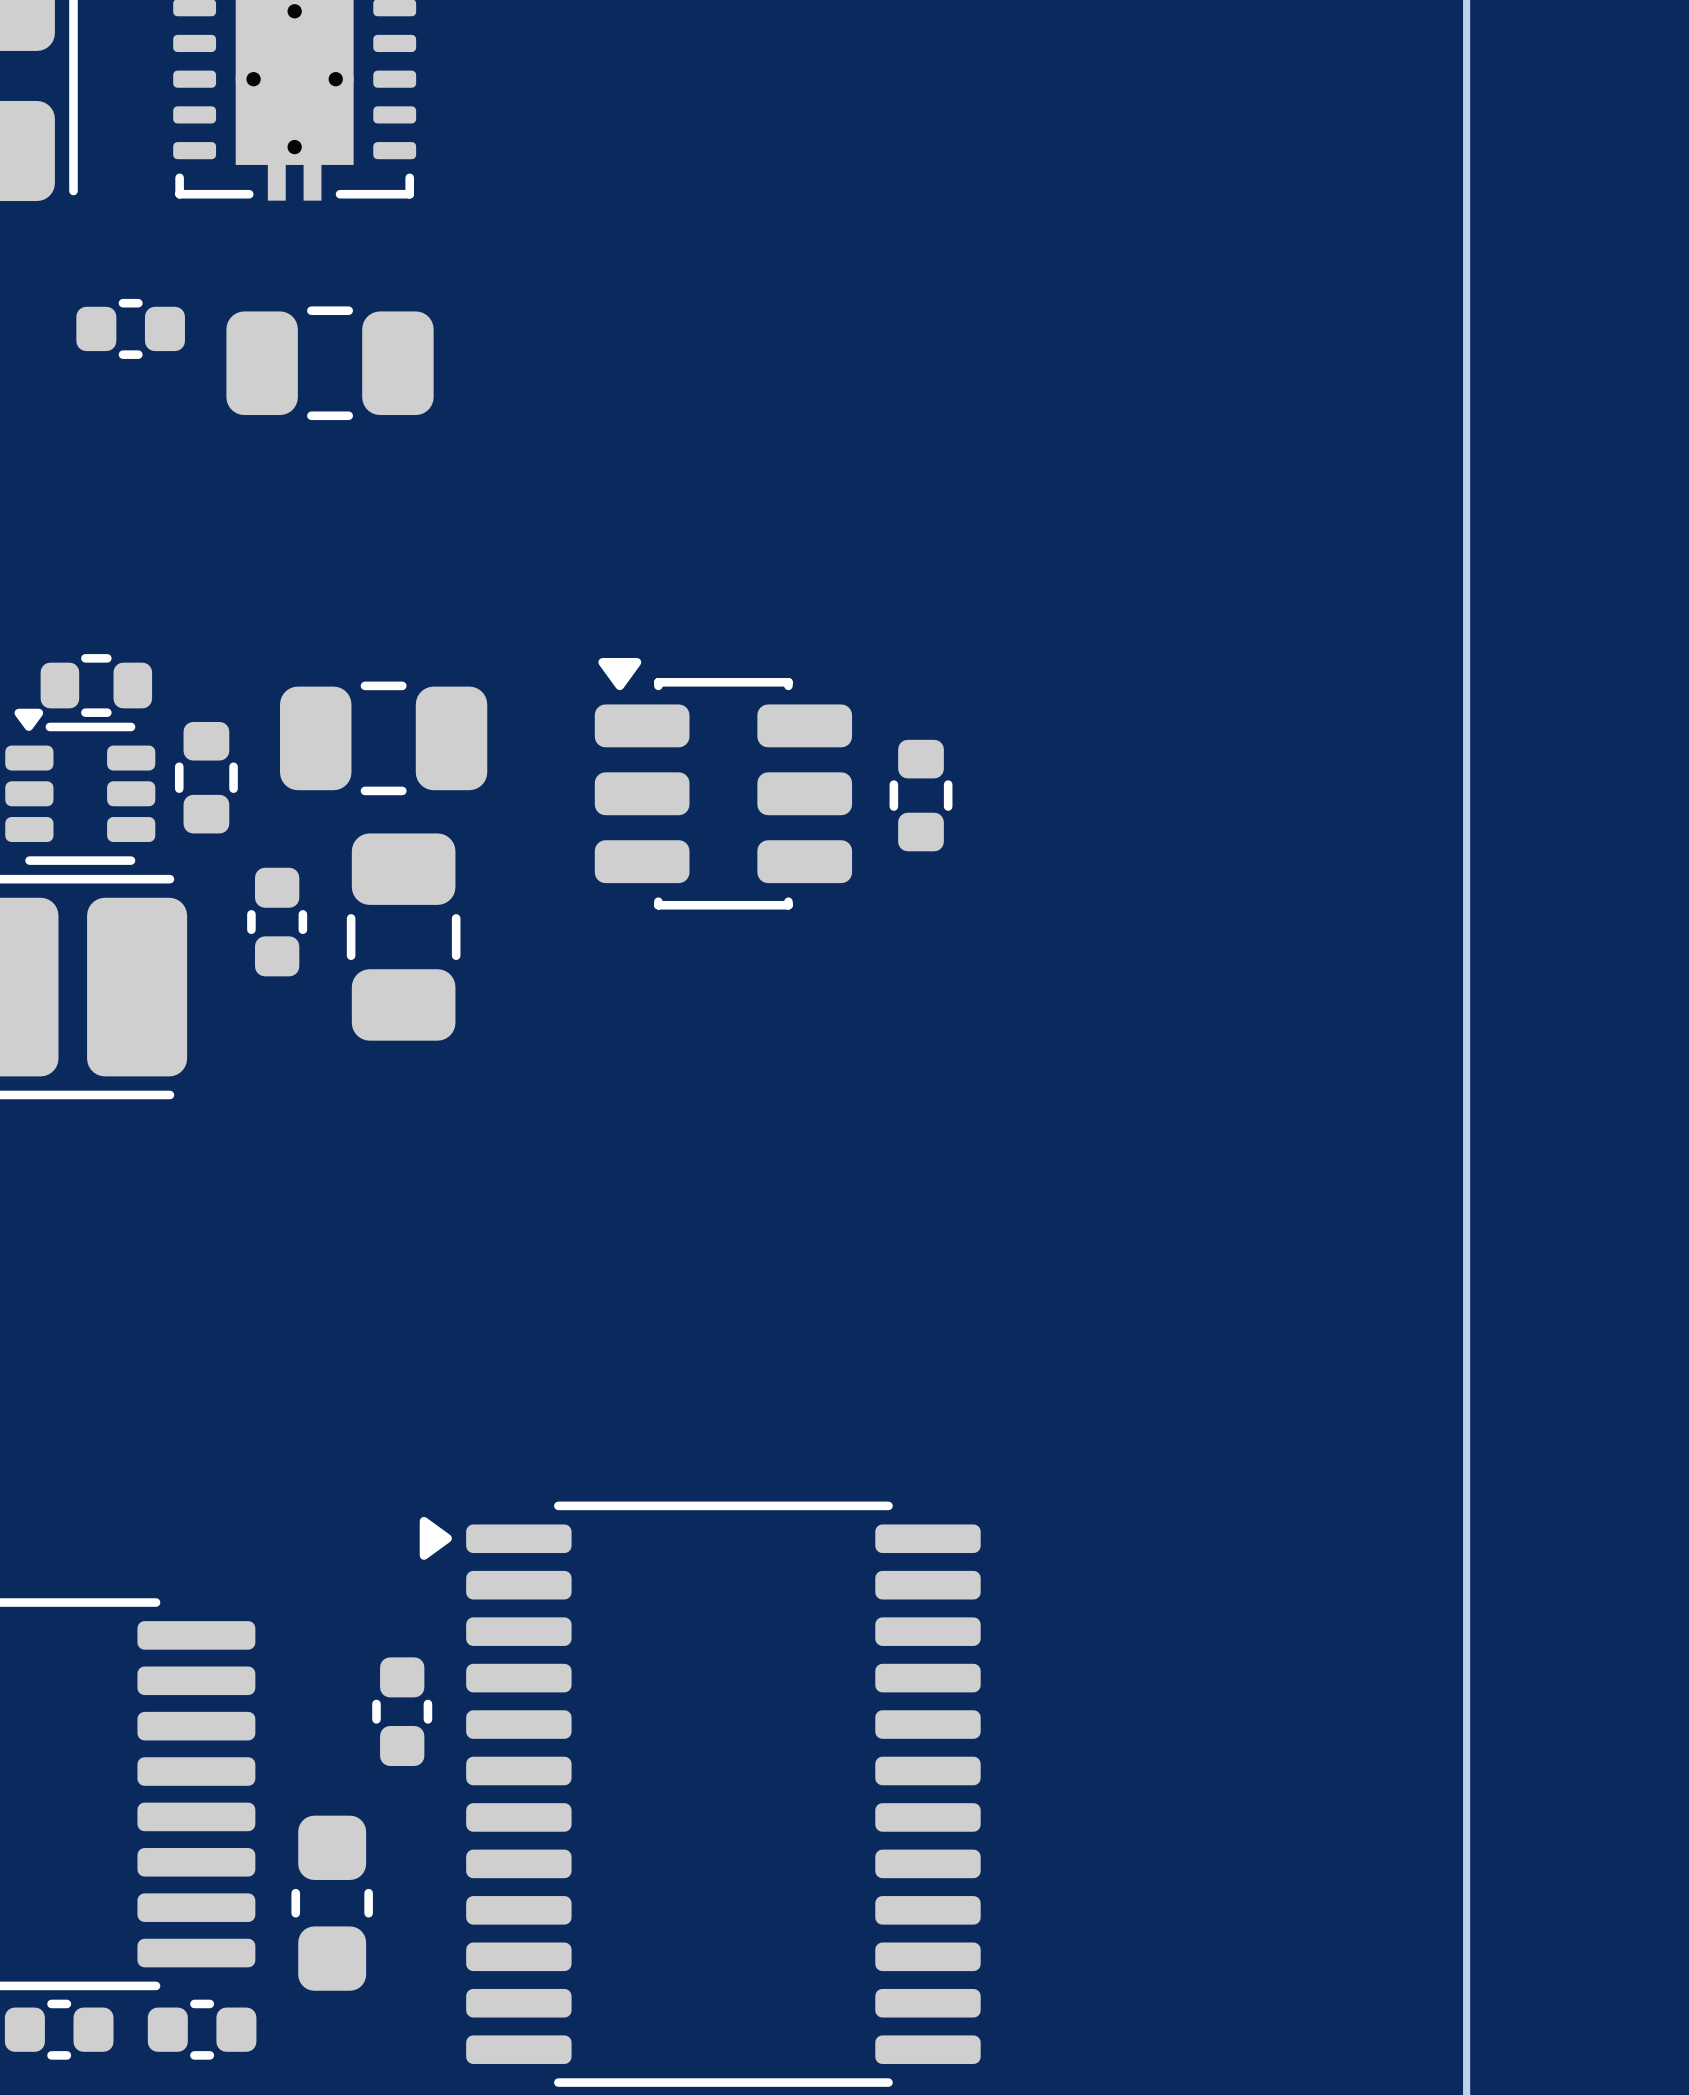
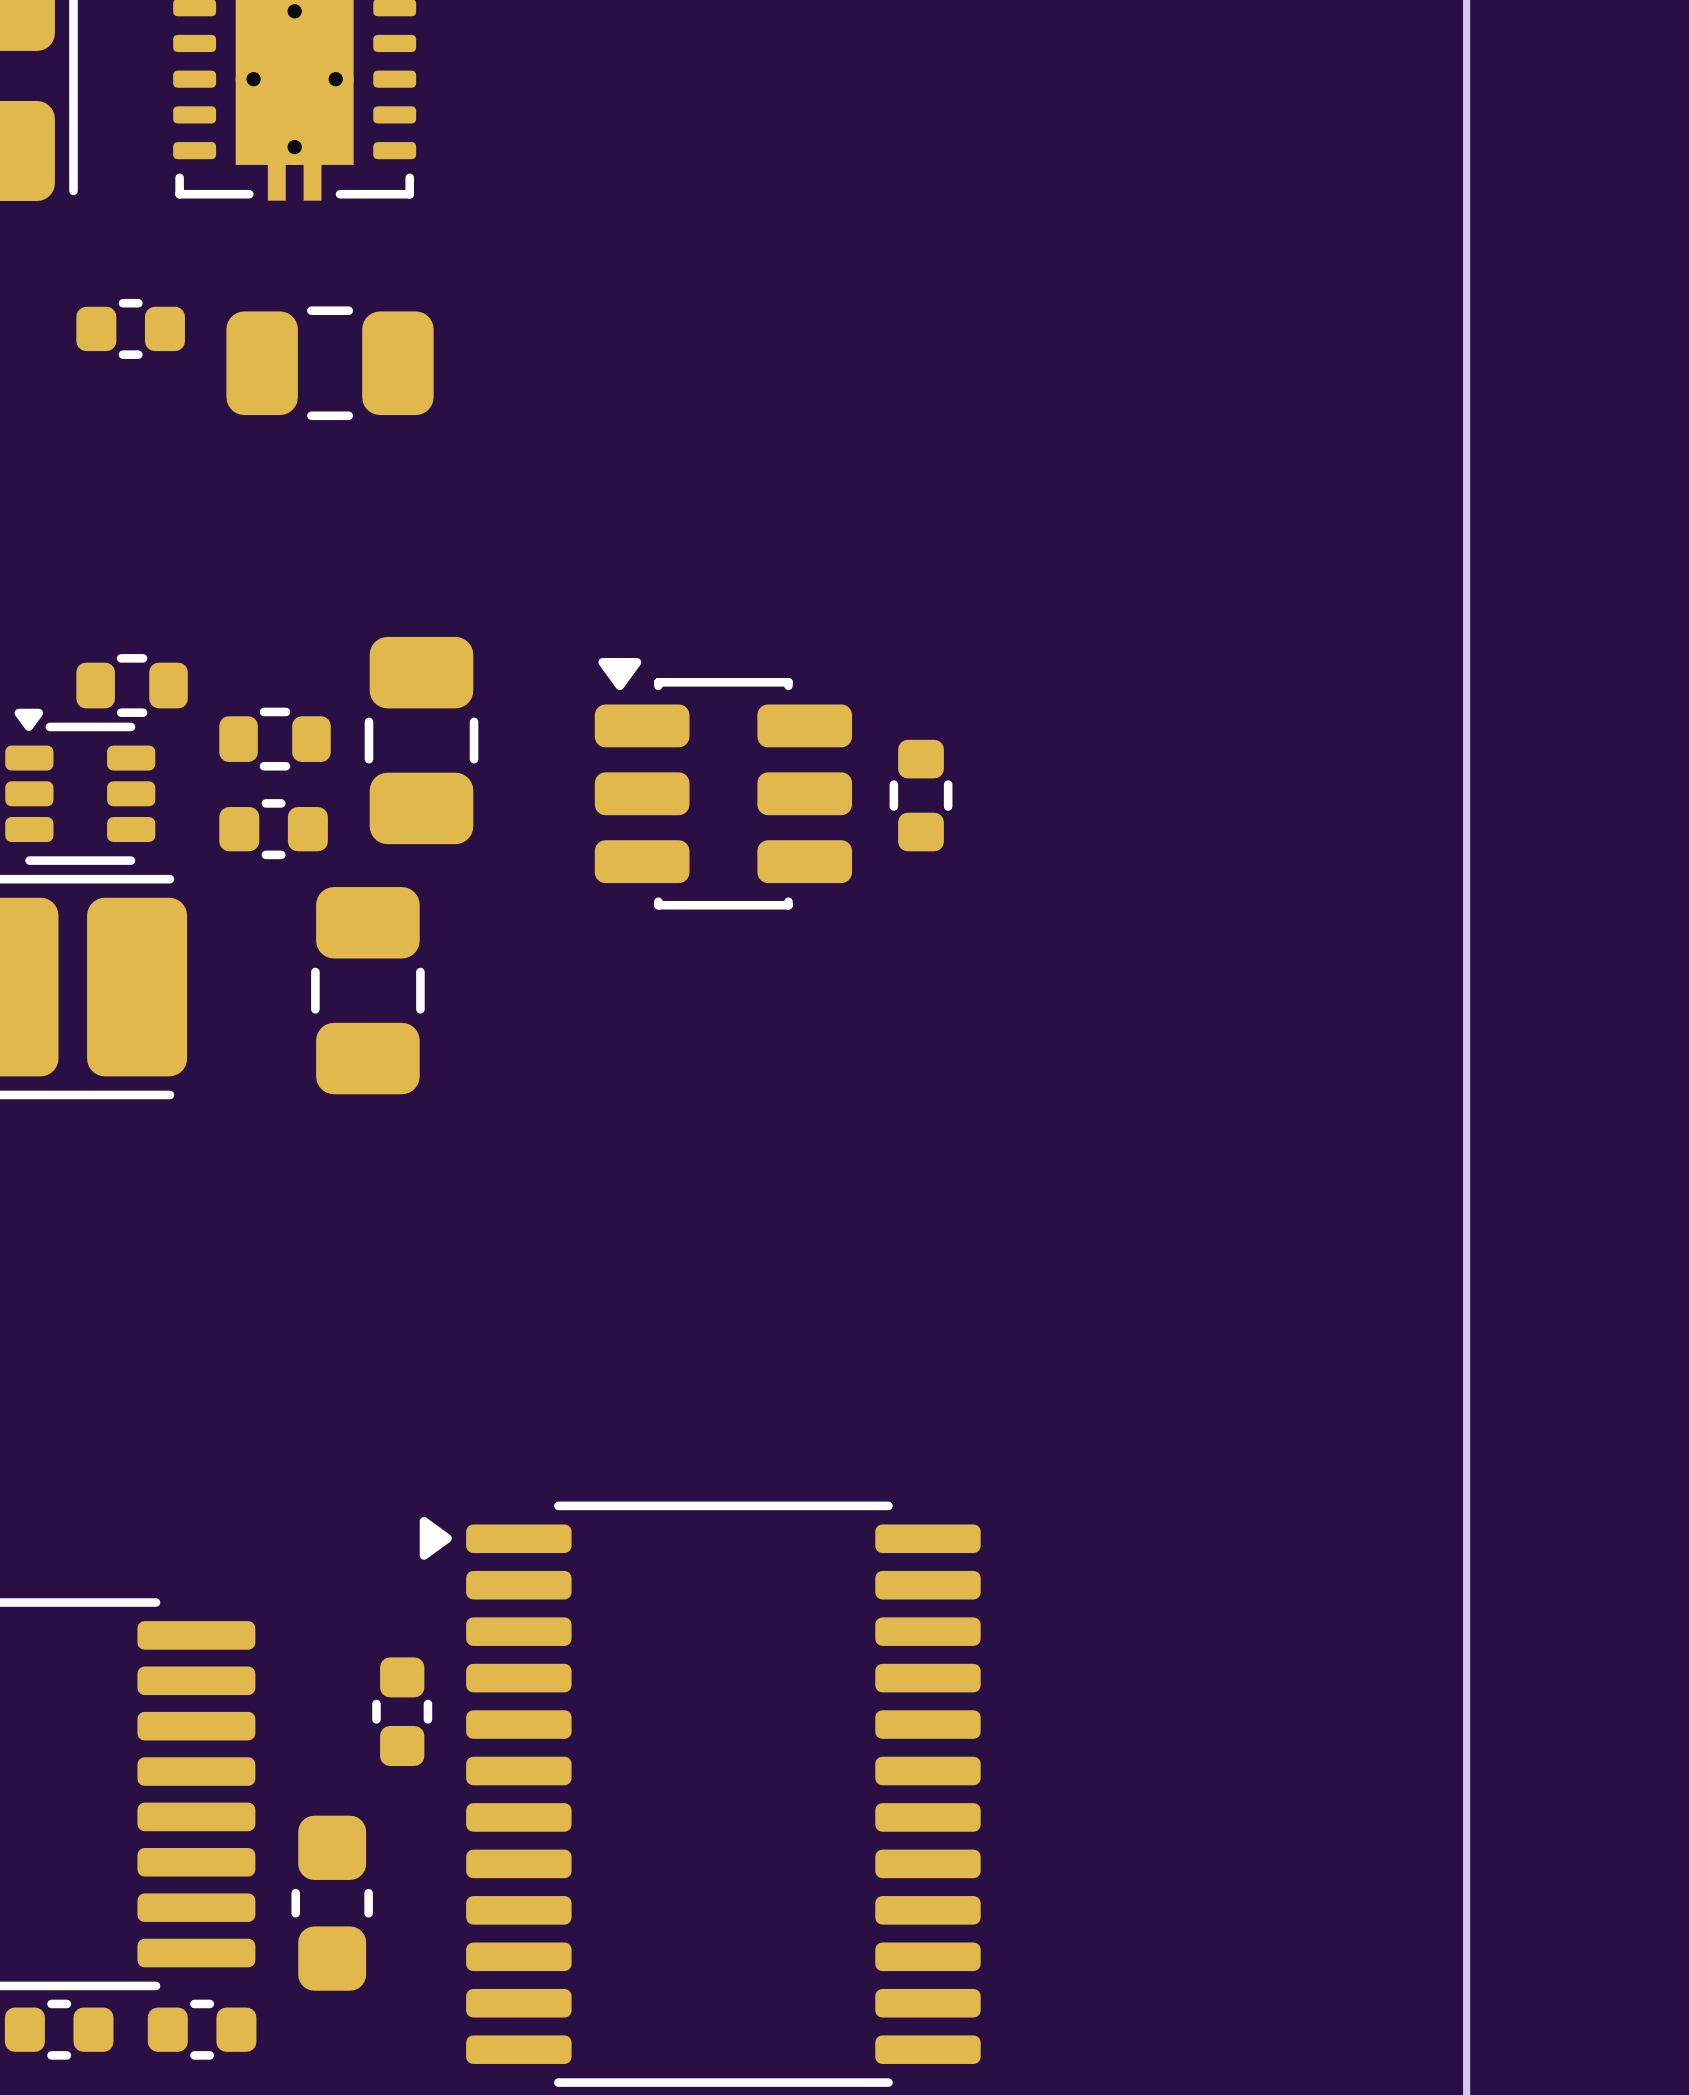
part position: (96, 685) -> (132, 685)
part rotation: 0° (383, 738) -> 90° clockwise (421, 740)
part rotation: 0° (206, 777) -> 90° clockwise (275, 739)
part position: (206, 777) -> (275, 739)
part rotation: 0° (277, 922) -> 90° clockwise (273, 829)
part position: (277, 922) -> (273, 829)
part position: (403, 937) -> (367, 990)

